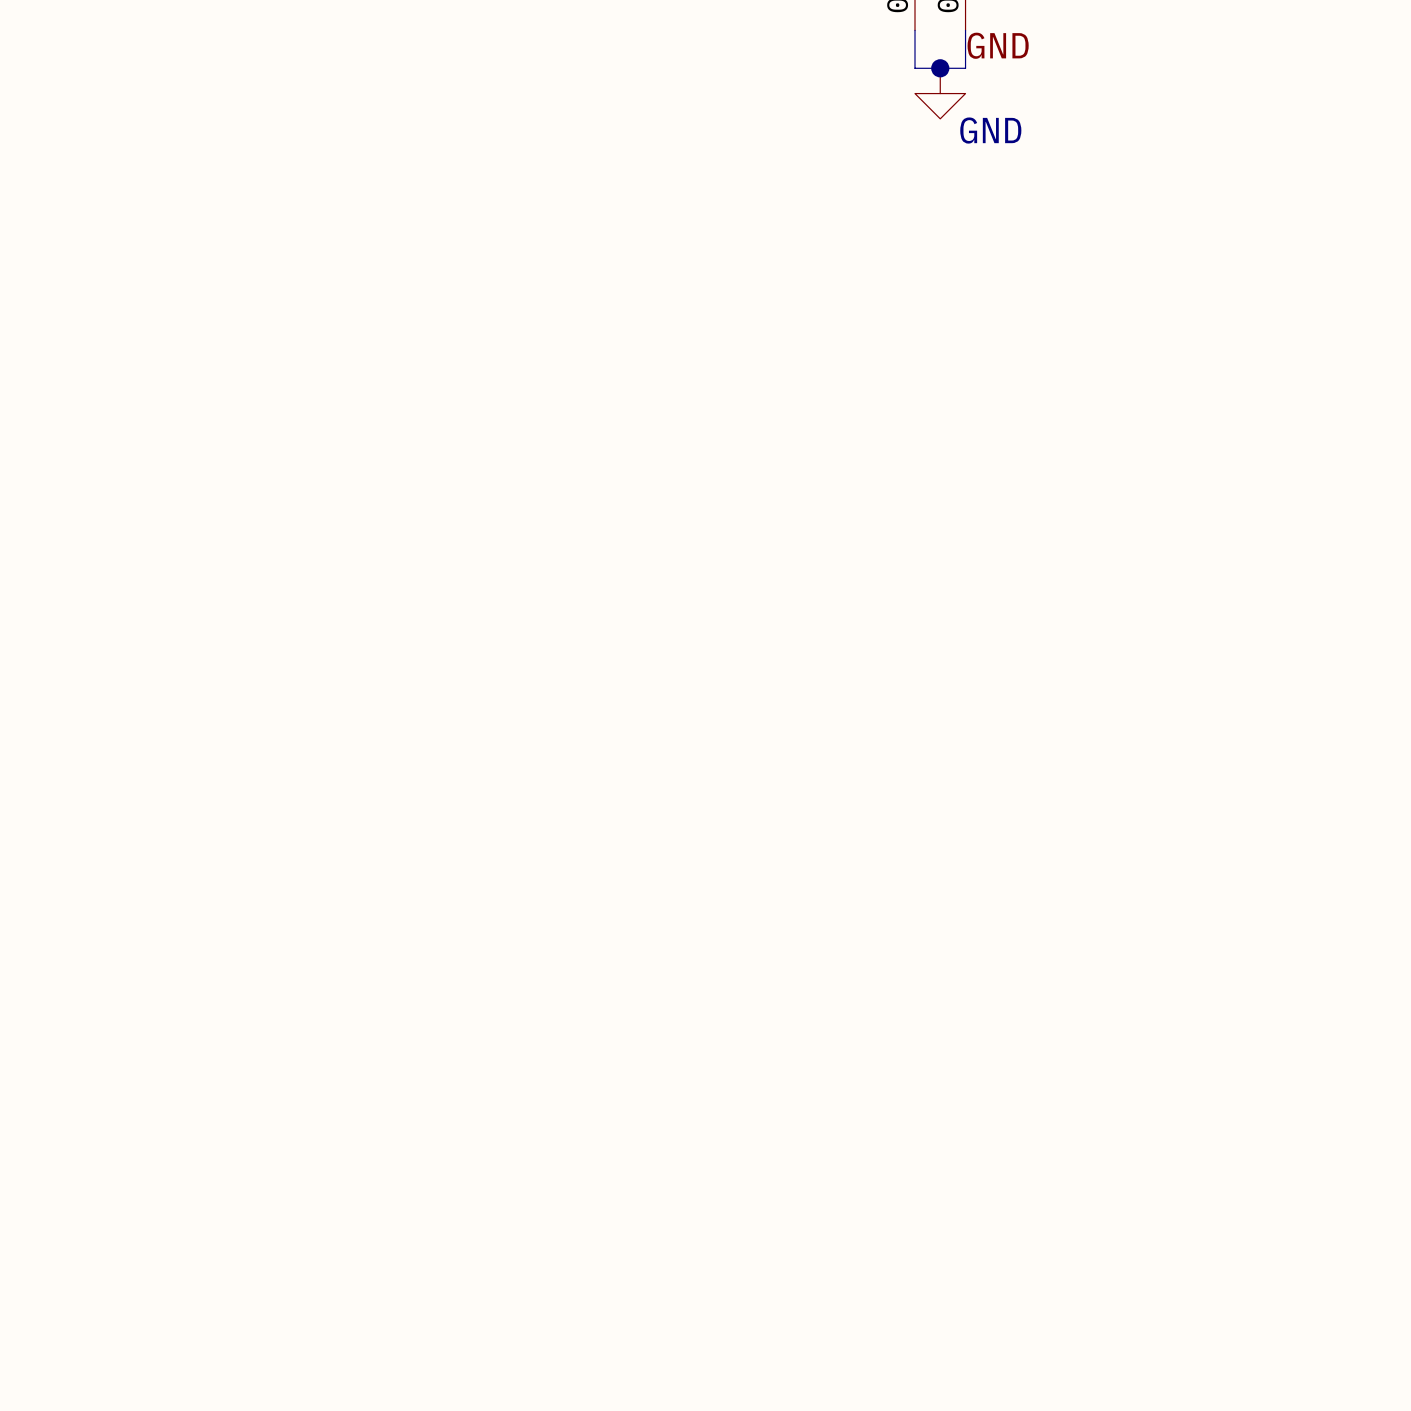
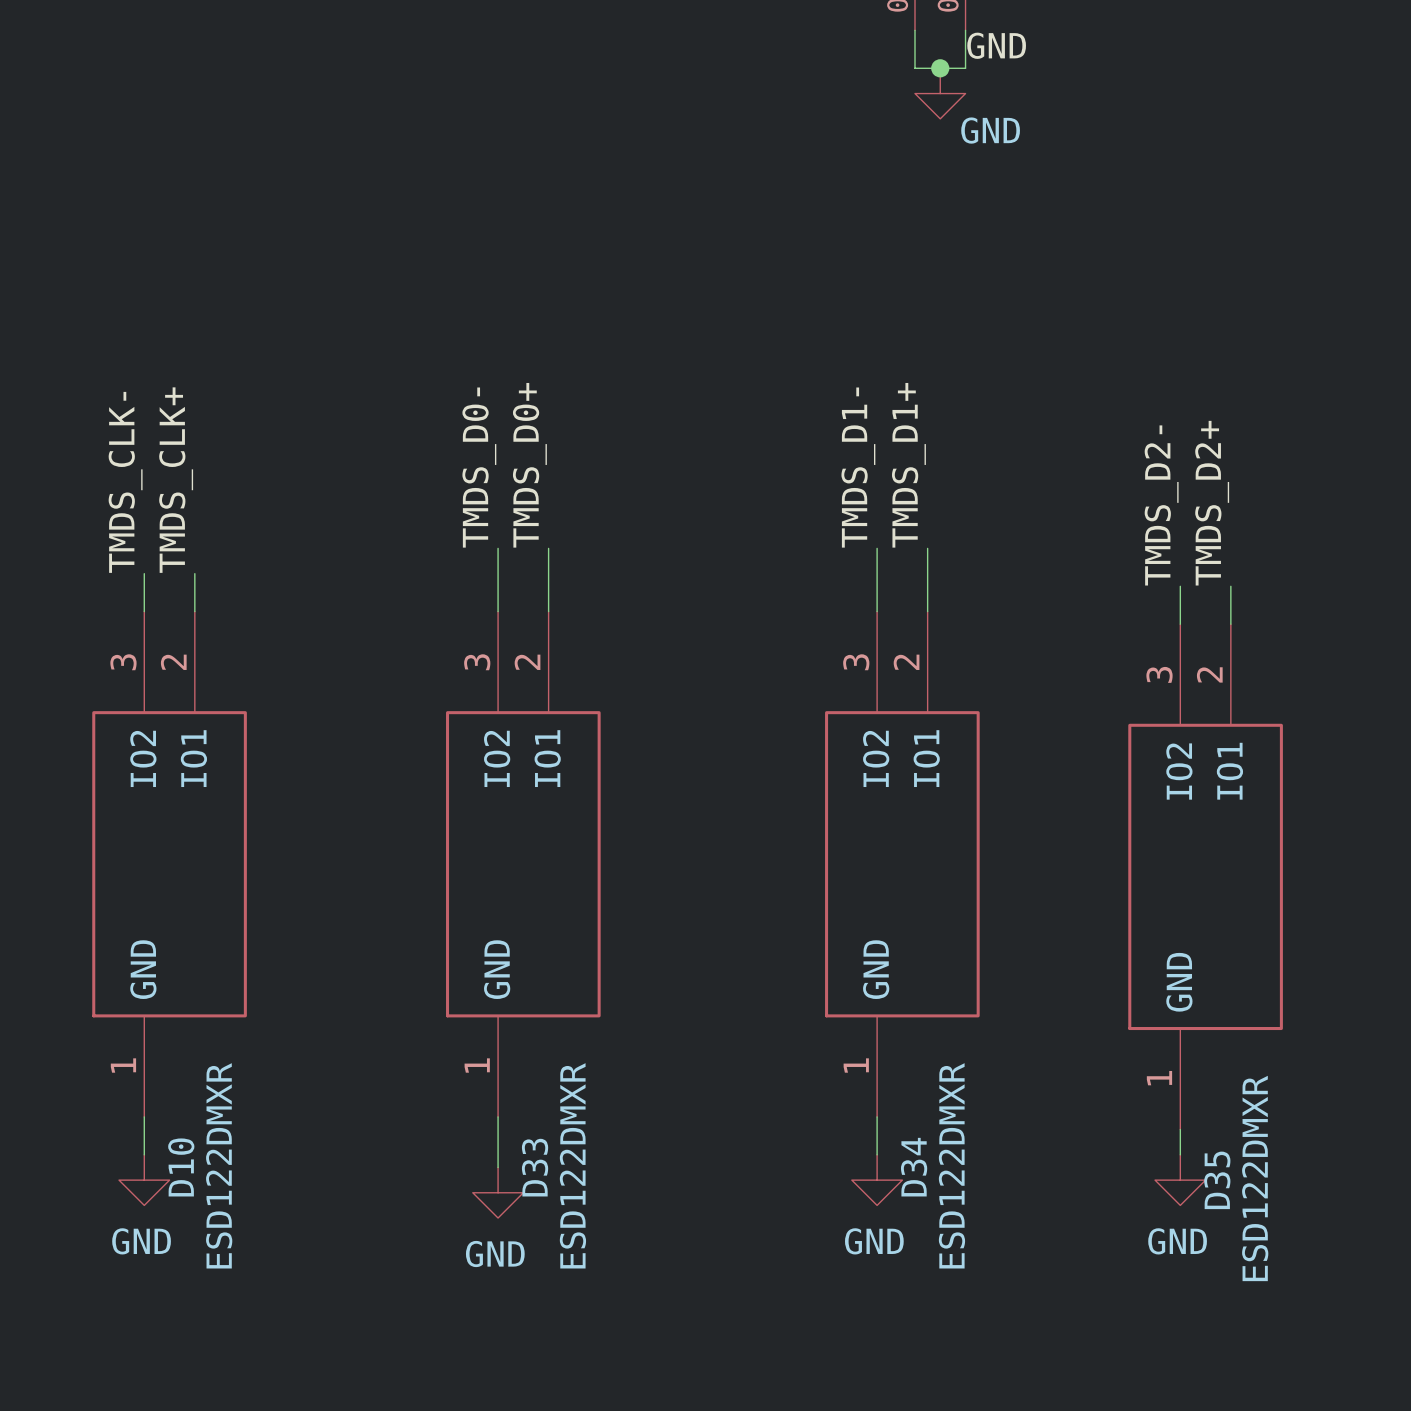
label: none -> TMDS_D0+ (529, 465)
label: none -> TMDS_D1+ (908, 465)
label: none -> TMDS_D0- (479, 467)
label: none -> TMDS_D1- (858, 467)
label: none -> TMDS_CLK+ (176, 480)
label: none -> TMDS_CLK- (125, 482)
label: none -> TMDS_D2+ (1212, 503)
label: none -> TMDS_D2- (1161, 505)
wire: none -> (498, 548) (498, 611)
wire: none -> (548, 548) (548, 611)
wire: none -> (877, 548) (877, 611)
wire: none -> (927, 548) (927, 611)
wire: none -> (144, 573) (144, 611)
wire: none -> (194, 573) (194, 611)
wire: none -> (1180, 586) (1180, 624)
wire: none -> (1230, 586) (1230, 624)
D10: none -> ESD122DMXR (169, 864)
D33: none -> ESD122DMXR (523, 864)
D34: none -> ESD122DMXR (902, 864)
D35: none -> ESD122DMXR (1205, 876)
wire: none -> (144, 1116) (144, 1154)
wire: none -> (498, 1116) (498, 1167)
wire: none -> (877, 1116) (877, 1154)
wire: none -> (1180, 1129) (1180, 1154)
power symbol: none -> GND (144, 1180)
power symbol: none -> GND (877, 1180)
power symbol: none -> GND (1180, 1180)
power symbol: none -> GND (498, 1192)

